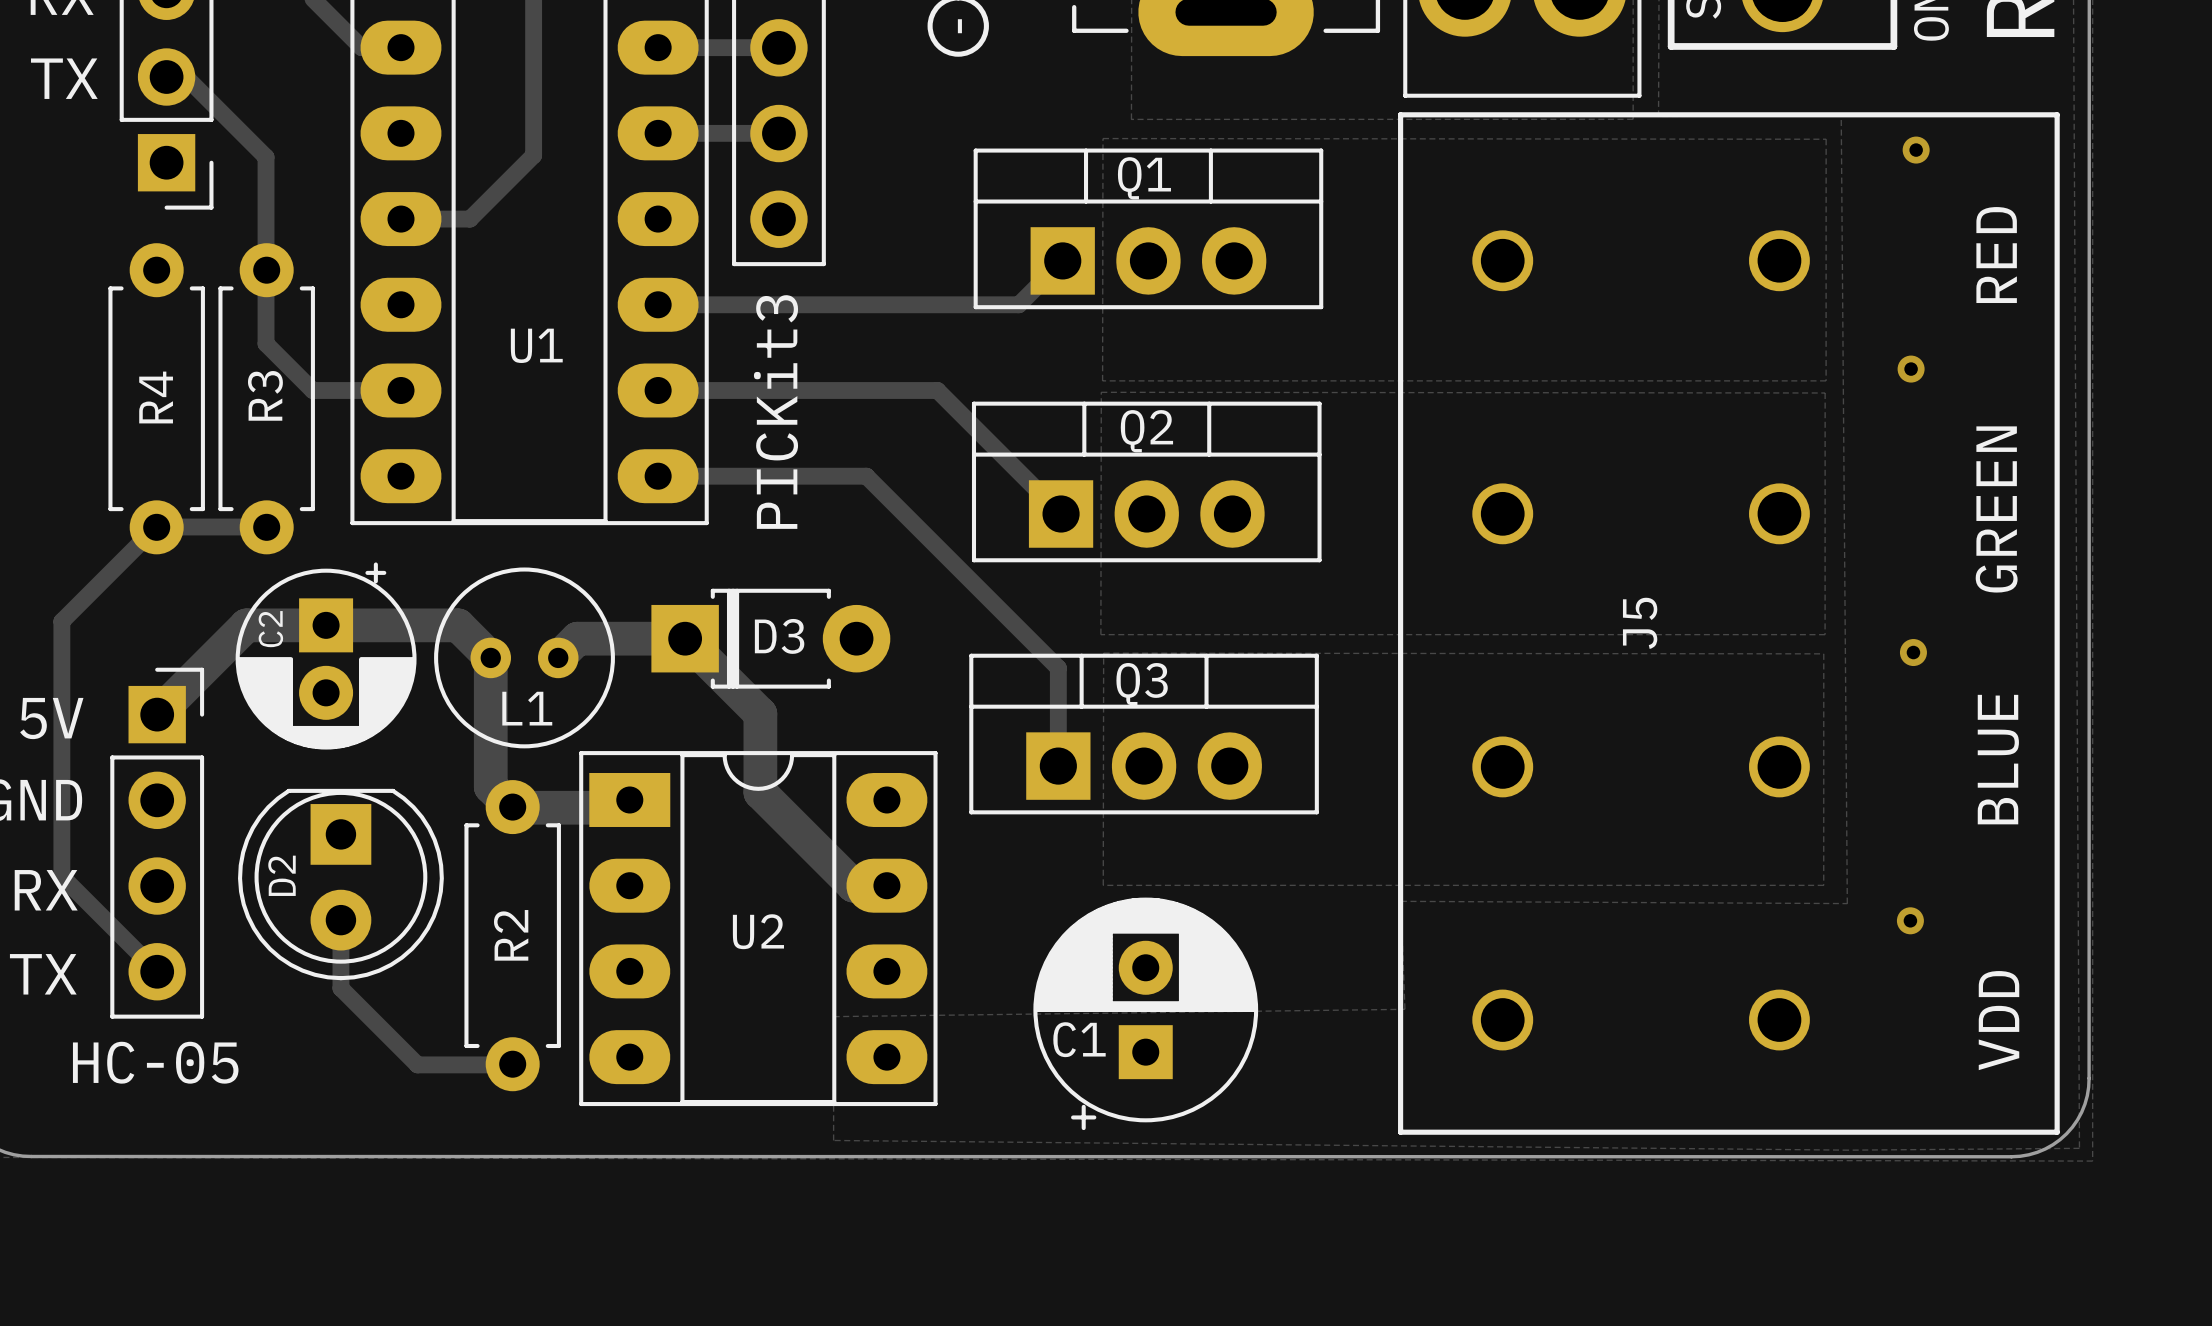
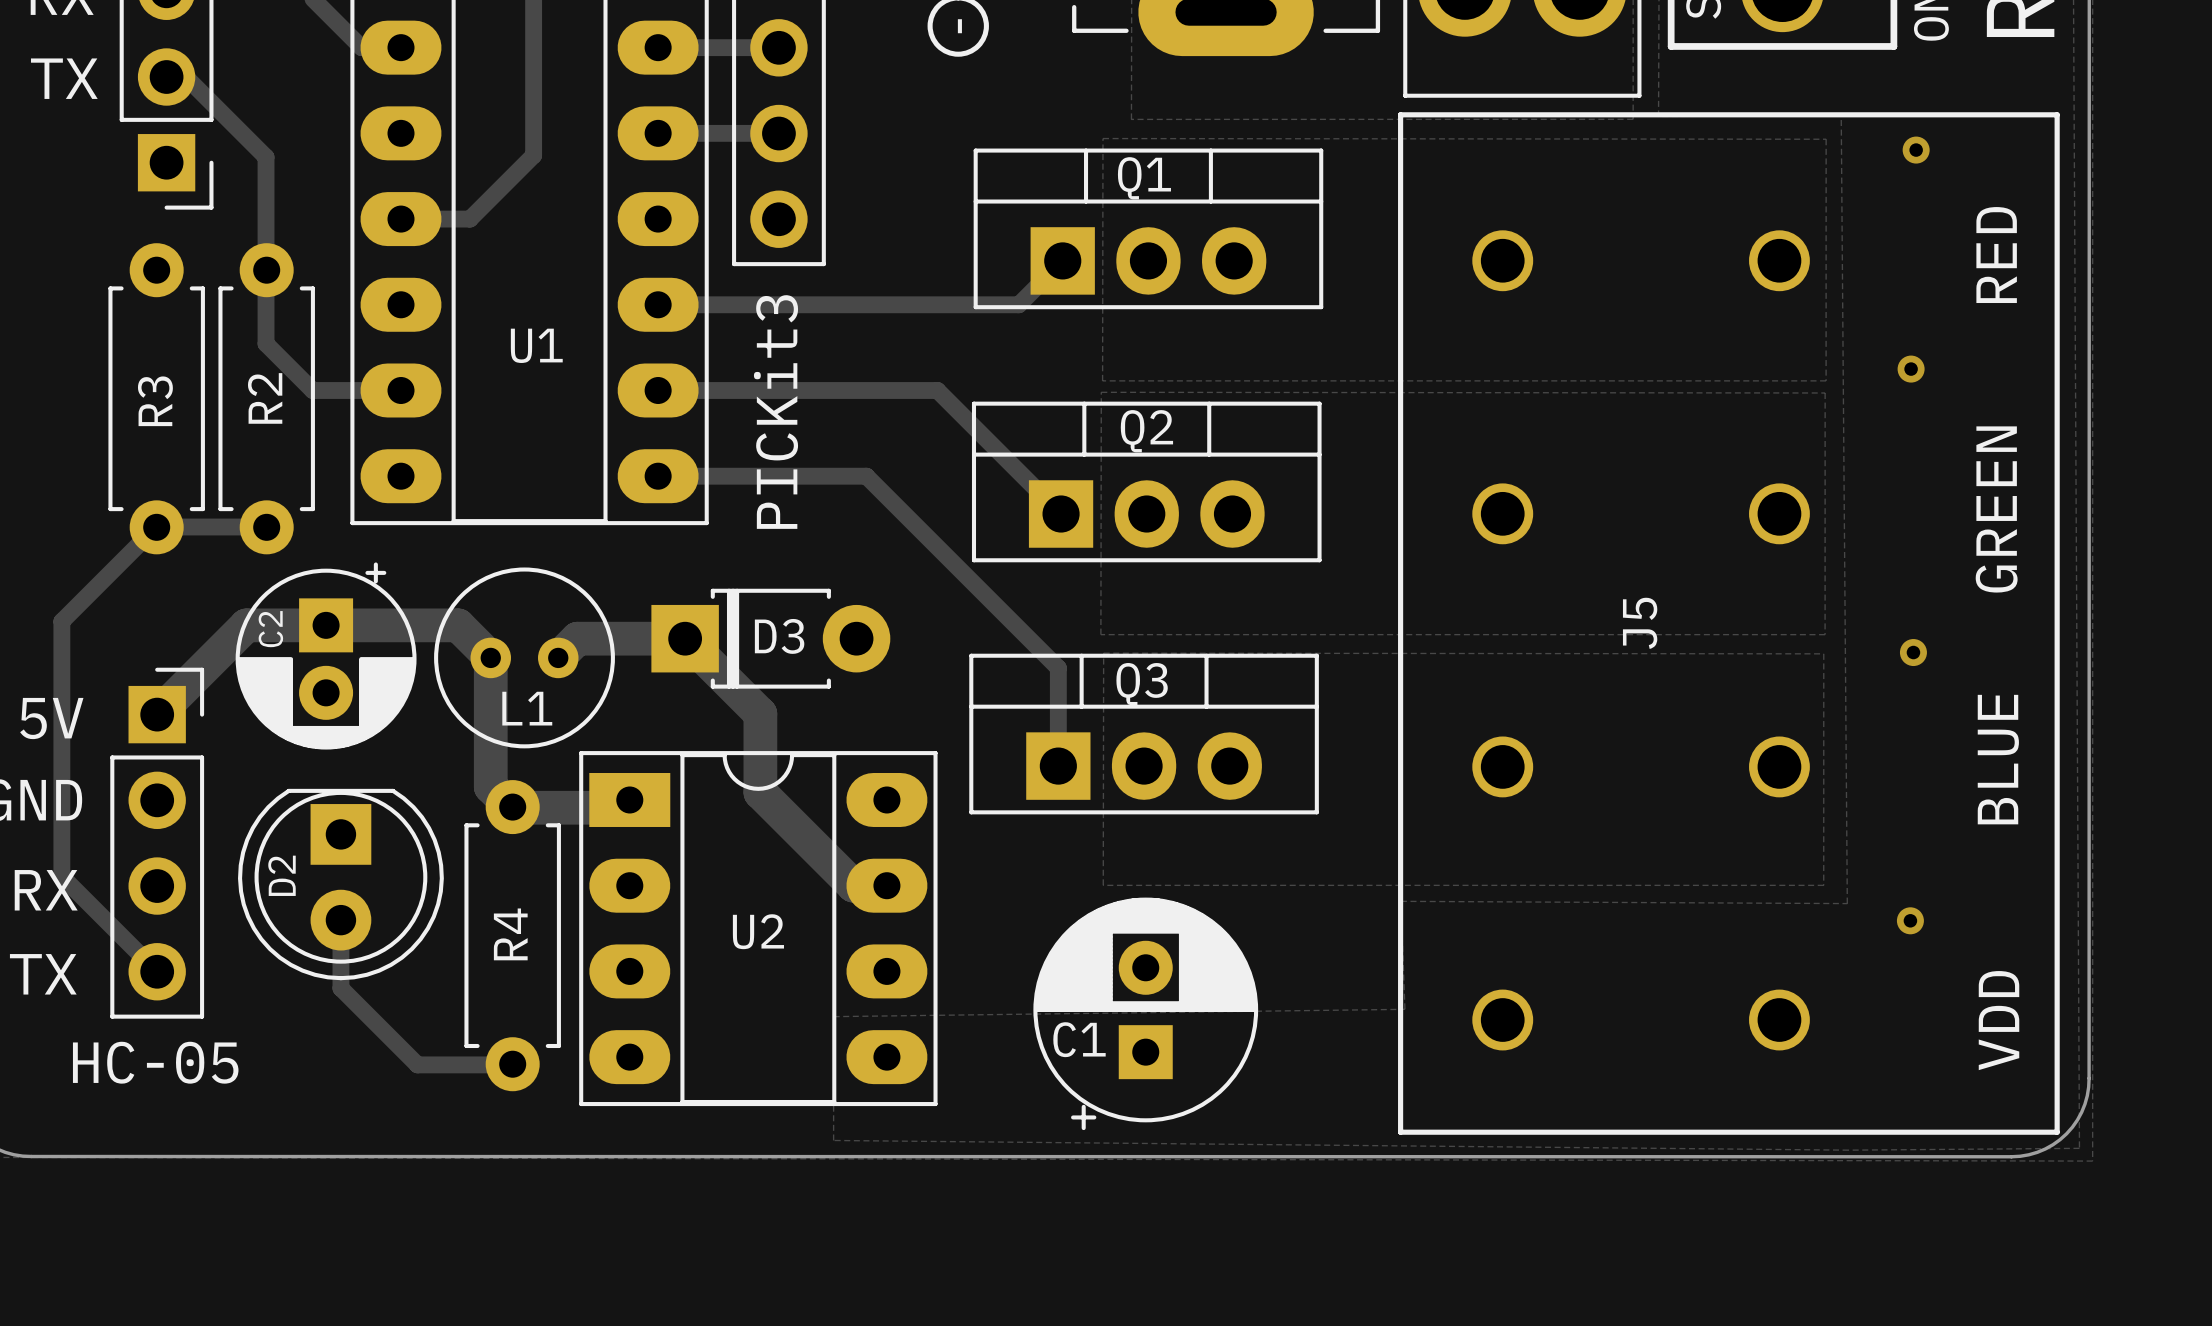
R3 name: R3 (265, 395) -> R2 (265, 398)
R4 name: R4 (156, 397) -> R3 (155, 401)
R2 name: R2 (511, 935) -> R4 (510, 934)

